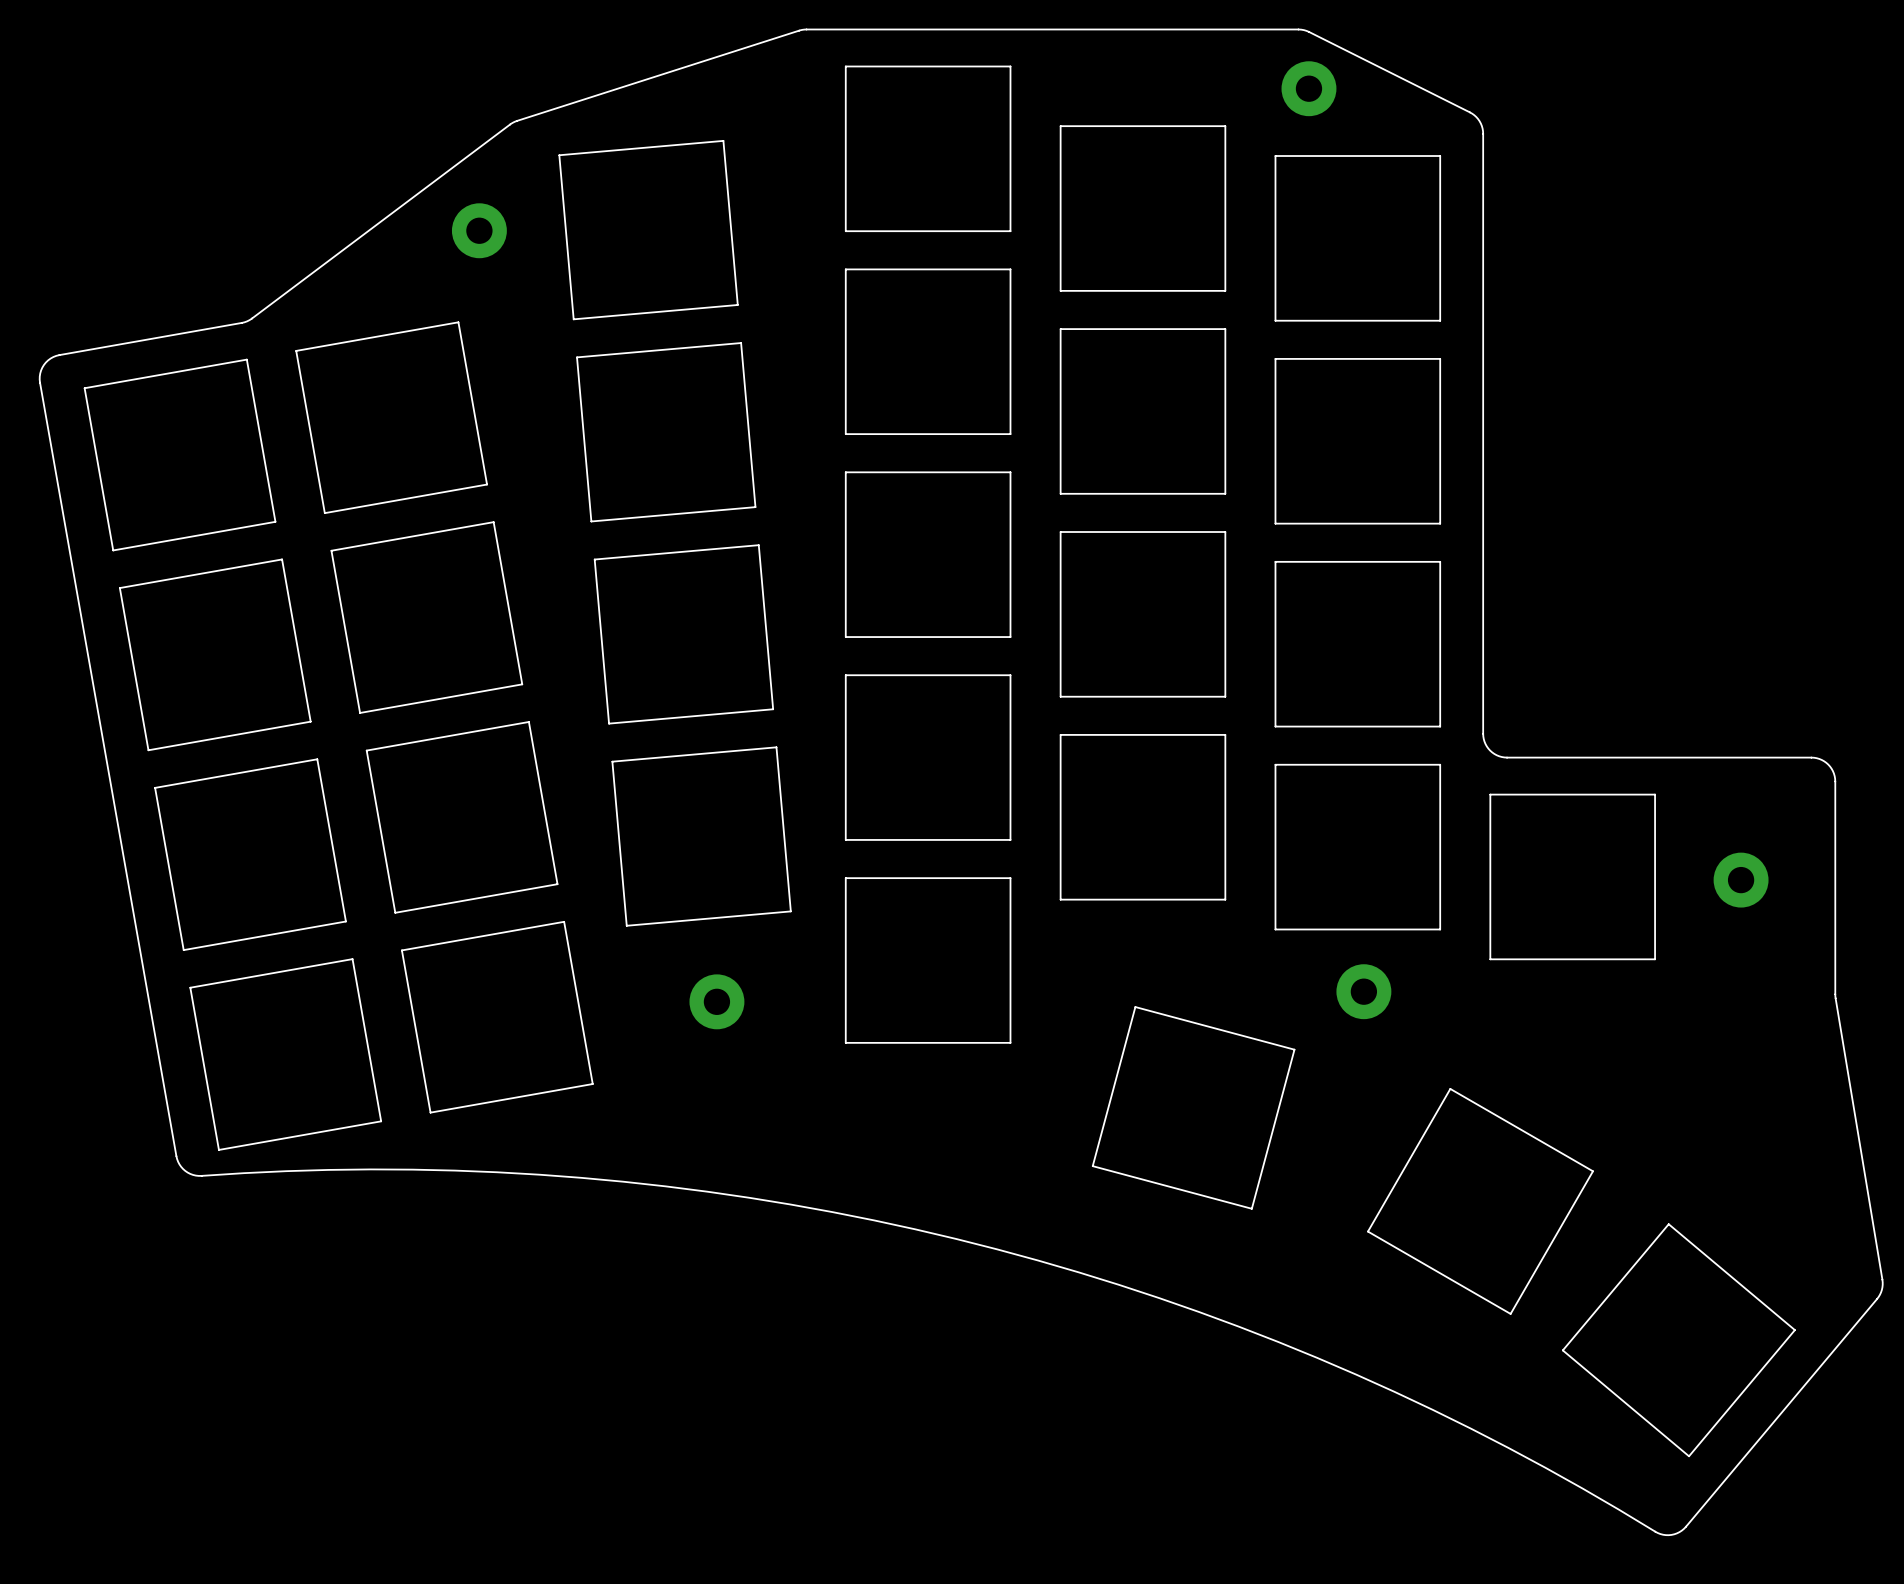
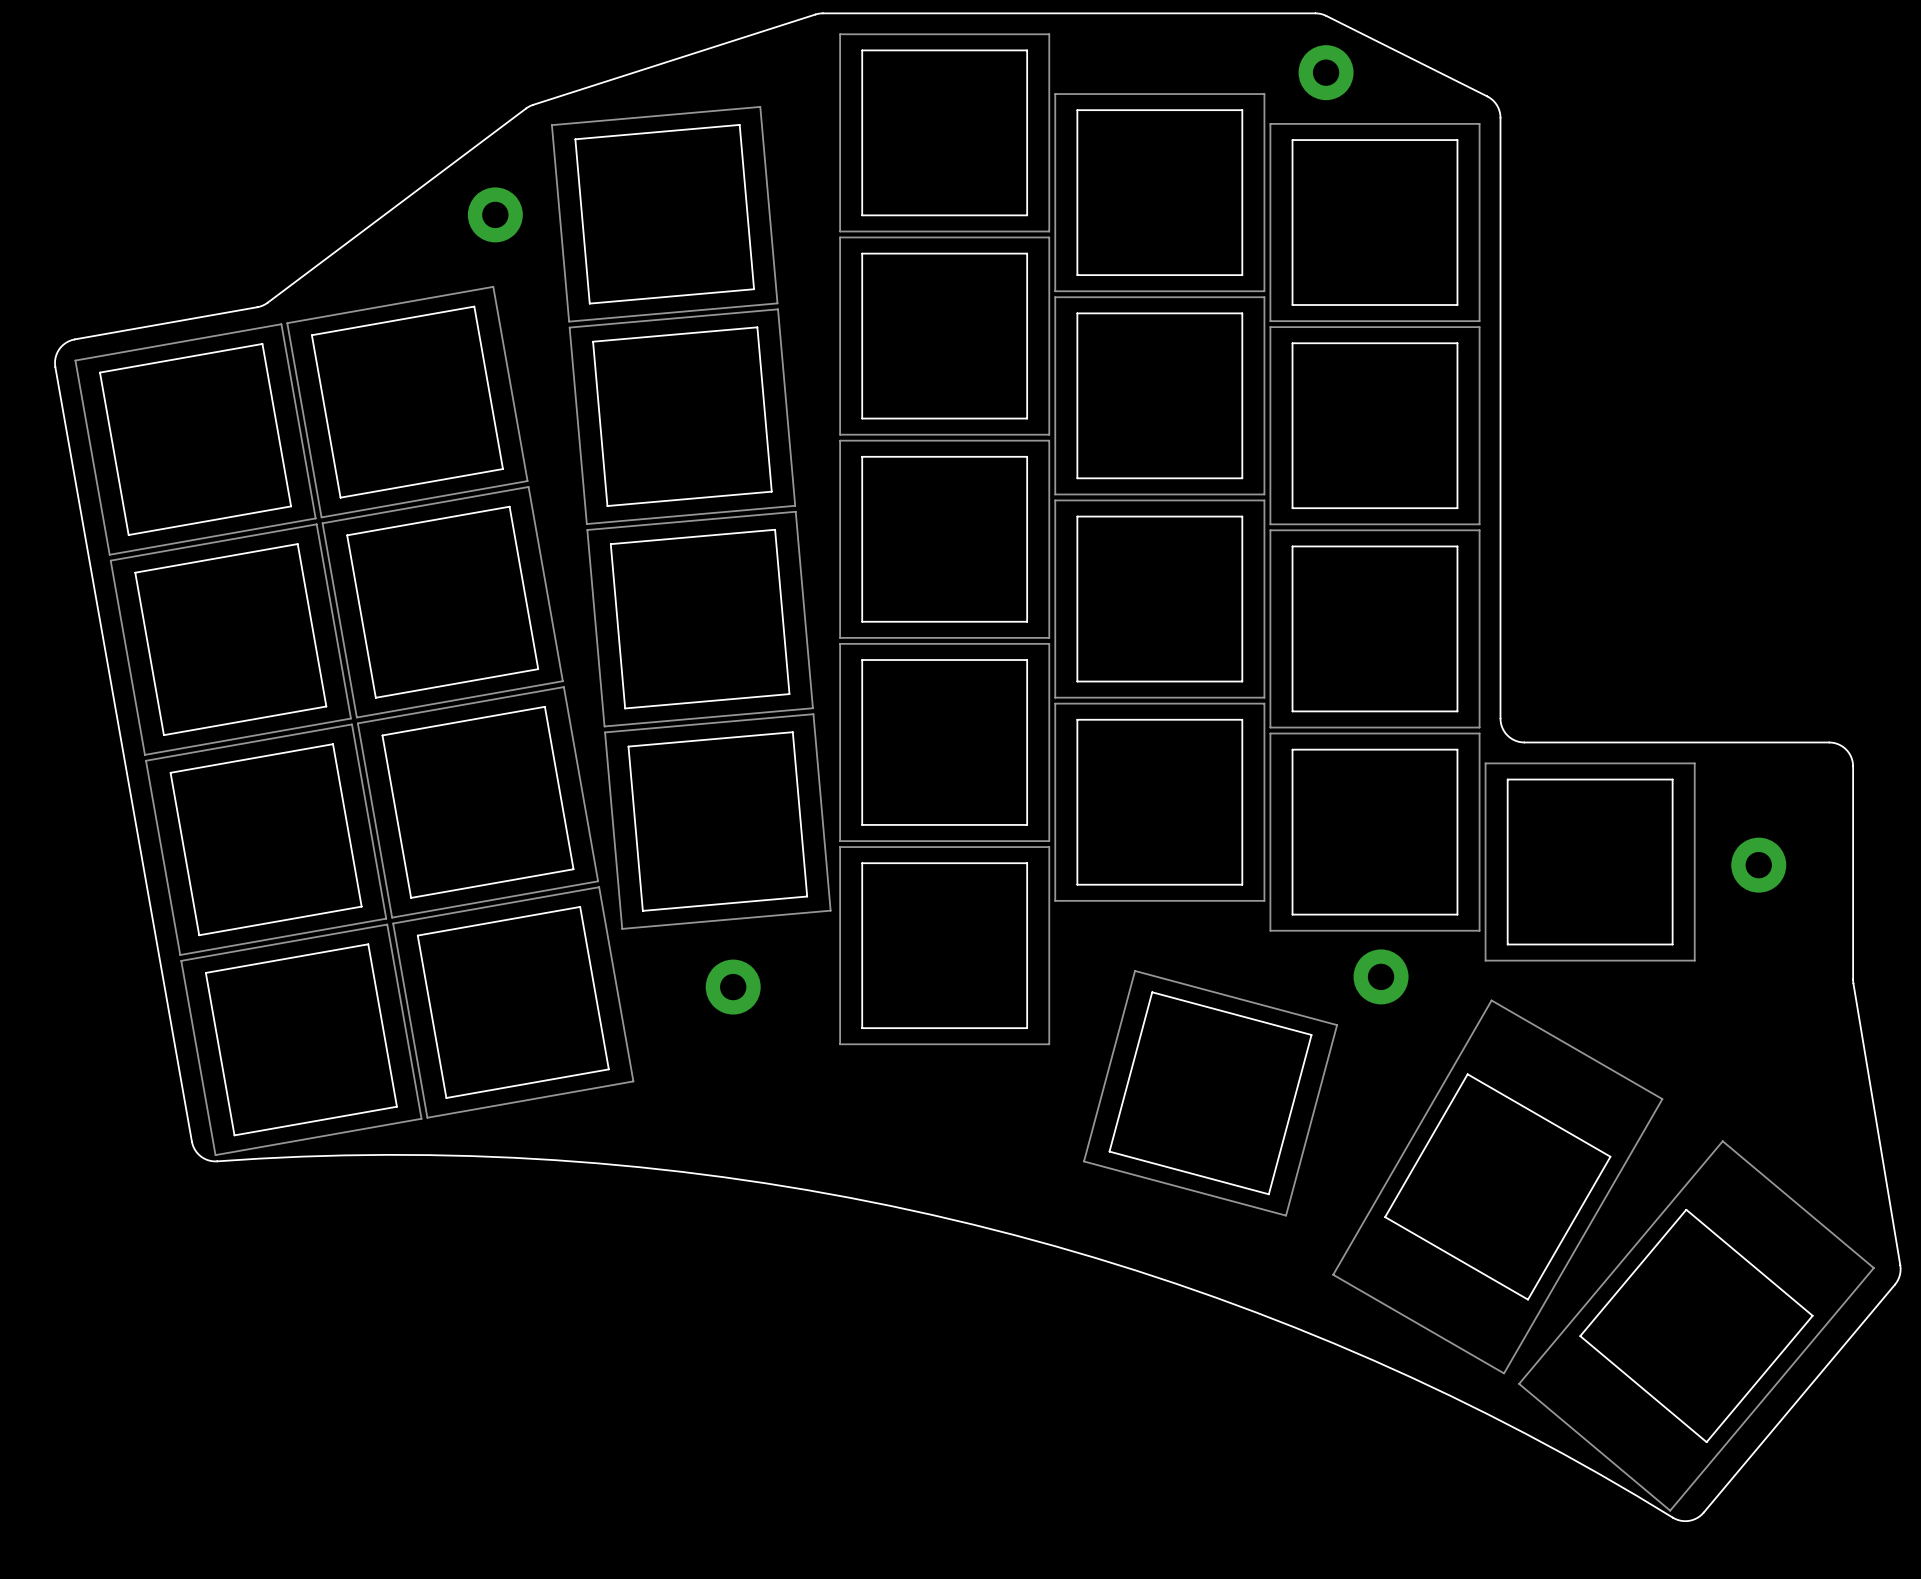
line: none -> (840, 34) (840, 231) (1049, 231) (1049, 34) (840, 34)
line: none -> (1055, 94) (1055, 291) (1264, 291) (1264, 94) (1055, 94)
line: none -> (760, 106) (777, 303) (569, 321) (551, 125) (760, 106)
line: none -> (1270, 123) (1270, 321) (1479, 321) (1479, 123) (1270, 123)
line: none -> (840, 237) (840, 434) (1049, 434) (1049, 237) (840, 237)
line: none -> (493, 286) (287, 323) (321, 517) (527, 481) (493, 286)
line: none -> (1055, 297) (1055, 494) (1264, 494) (1264, 297) (1055, 297)
line: none -> (778, 309) (795, 505) (586, 524) (569, 327) (778, 309)
line: none -> (281, 324) (315, 518) (109, 554) (75, 360) (281, 324)
line: none -> (1270, 327) (1270, 524) (1479, 524) (1479, 327) (1270, 327)
line: none -> (840, 440) (840, 637) (1049, 637) (1049, 440) (840, 440)
line: none -> (528, 486) (322, 523) (356, 717) (562, 681) (528, 486)
line: none -> (1055, 500) (1055, 697) (1264, 697) (1264, 500) (1055, 500)
line: none -> (795, 511) (812, 708) (604, 726) (587, 529) (795, 511)
line: none -> (316, 524) (350, 718) (144, 754) (110, 560) (316, 524)
line: none -> (1270, 530) (1270, 727) (1479, 727) (1479, 530) (1270, 530)
line: none -> (840, 643) (840, 841) (1049, 841) (1049, 643) (840, 643)
line: none -> (563, 687) (357, 723) (392, 917) (598, 881) (563, 687)
line: none -> (1055, 703) (1264, 703) (1264, 900) (1055, 900) (1055, 703)
line: none -> (813, 714) (830, 910) (622, 928) (605, 732) (813, 714)
line: none -> (352, 724) (386, 918) (180, 955) (146, 760) (352, 724)
line: none -> (1270, 733) (1479, 733) (1479, 930) (1270, 930) (1270, 733)
line: none -> (1485, 763) (1694, 763) (1694, 960) (1485, 960) (1485, 763)
line: none -> (840, 847) (1049, 847) (1049, 1044) (840, 1044) (840, 847)
line: none -> (599, 887) (393, 923) (427, 1117) (633, 1081) (599, 887)
line: none -> (387, 924) (421, 1118) (215, 1155) (181, 960) (387, 924)
line: none -> (1135, 970) (1337, 1025) (1286, 1215) (1084, 1161) (1135, 970)
line: none -> (1491, 1000) (1662, 1099) (1504, 1373) (1333, 1274) (1491, 1000)
line: none -> (1722, 1141) (1873, 1268) (1670, 1510) (1519, 1383) (1722, 1141)

